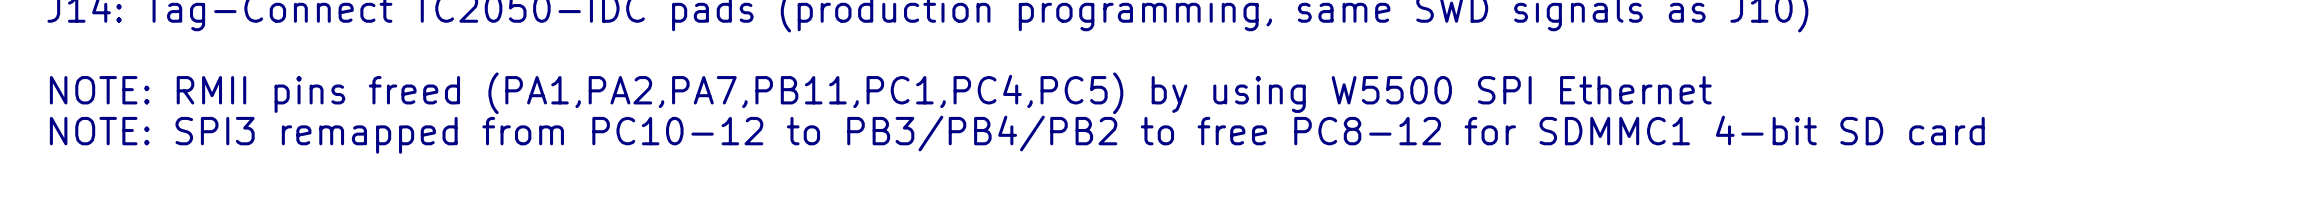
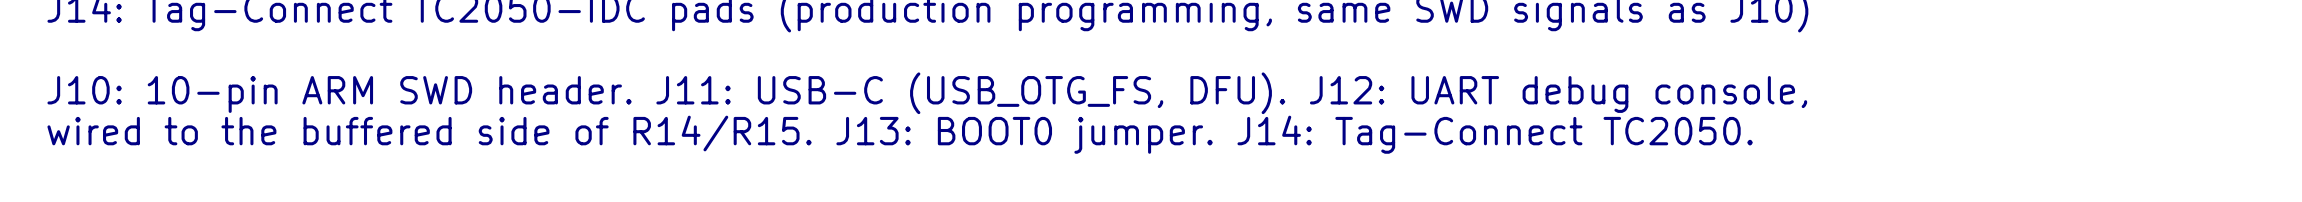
text: NOTE: RMII pins freed (PA1,PA2,PA7,PB11,PC1,PC4,PC5) by using W5500 SPI Ethernet (880, 93) -> J10: 10-pin ARM SWD header. J11: USB-C (USB_OTG_FS, DFU). J12: UART debug console, (927, 93)
text: NOTE: SPI3 remapped from PC10-12 to PB3/PB4/PB2 to free PC8-12 for SDMMC1 4-bit SD card (1017, 134) -> wired to the buffered side of R14/R15. J13: BOOT0 jumper. J14: Tag-Connect TC2050. (900, 134)

